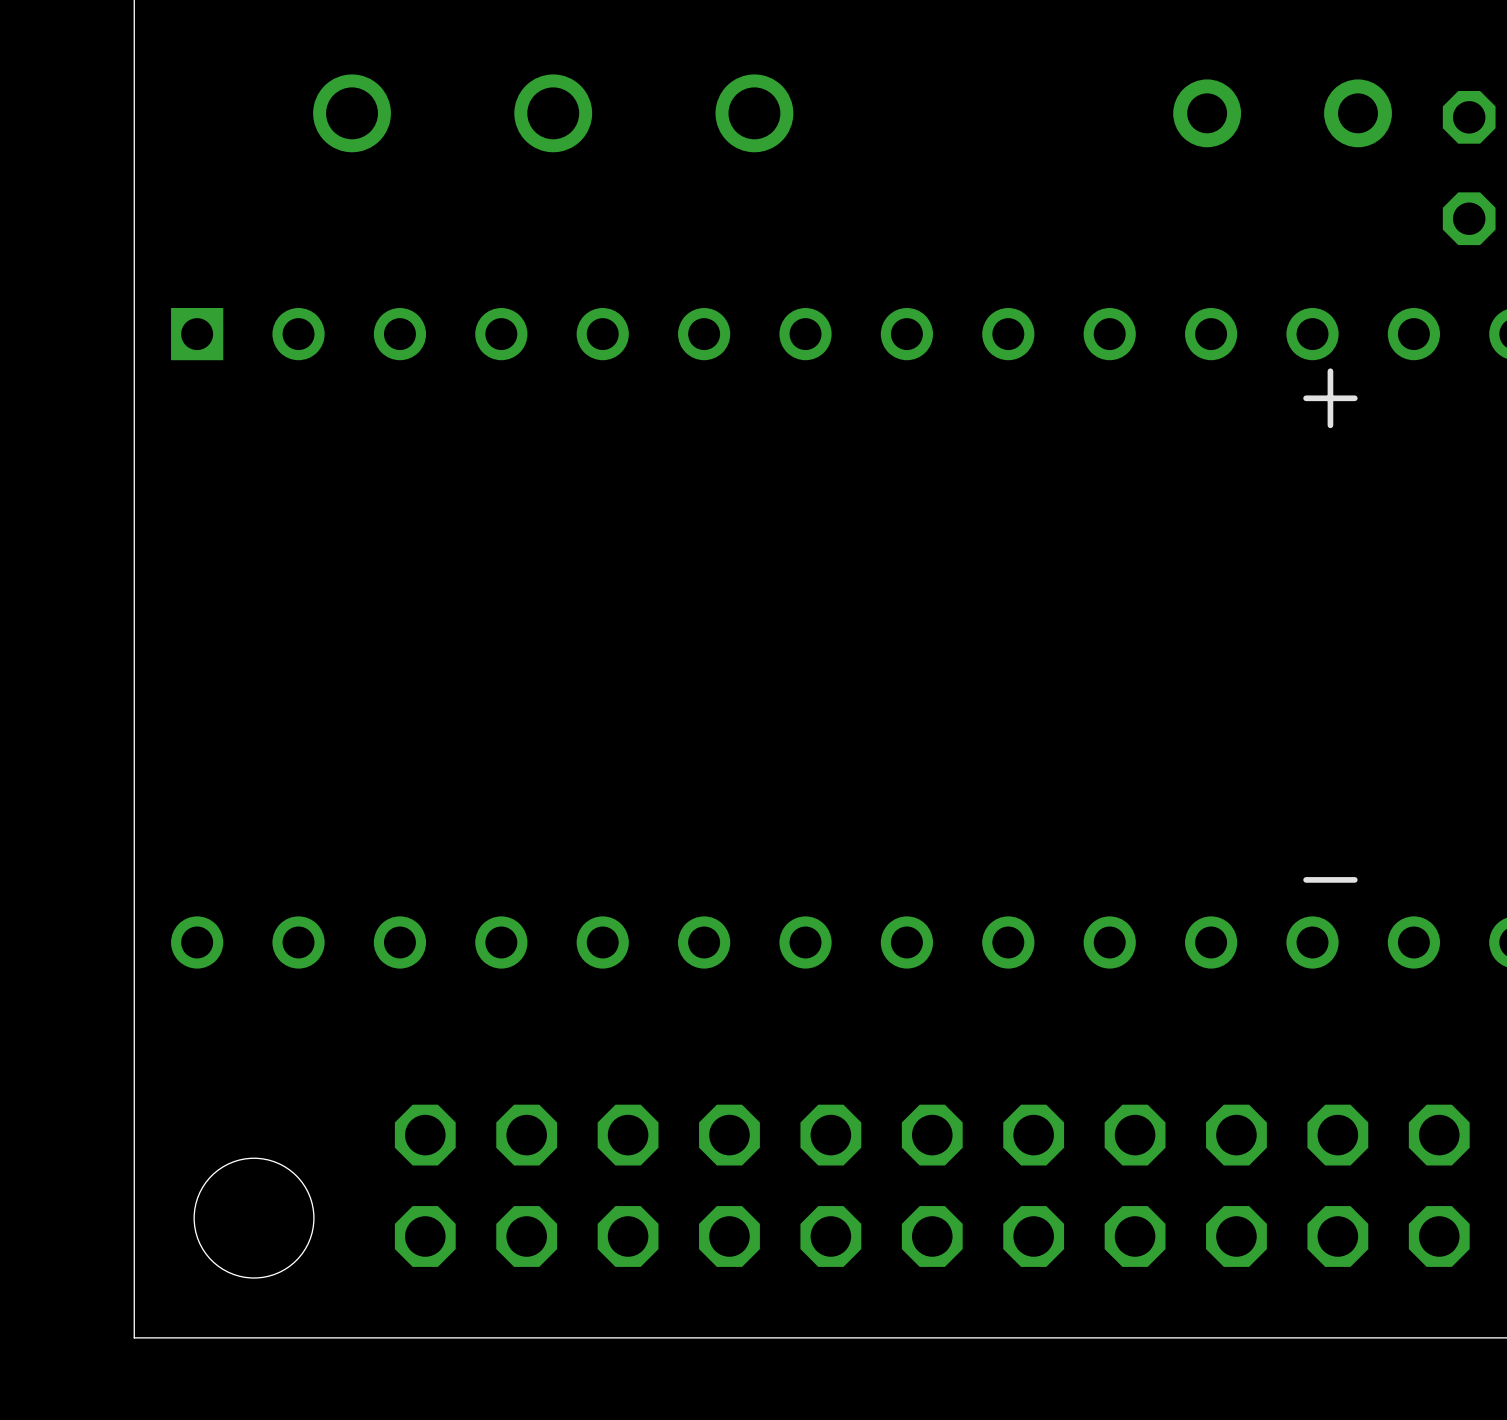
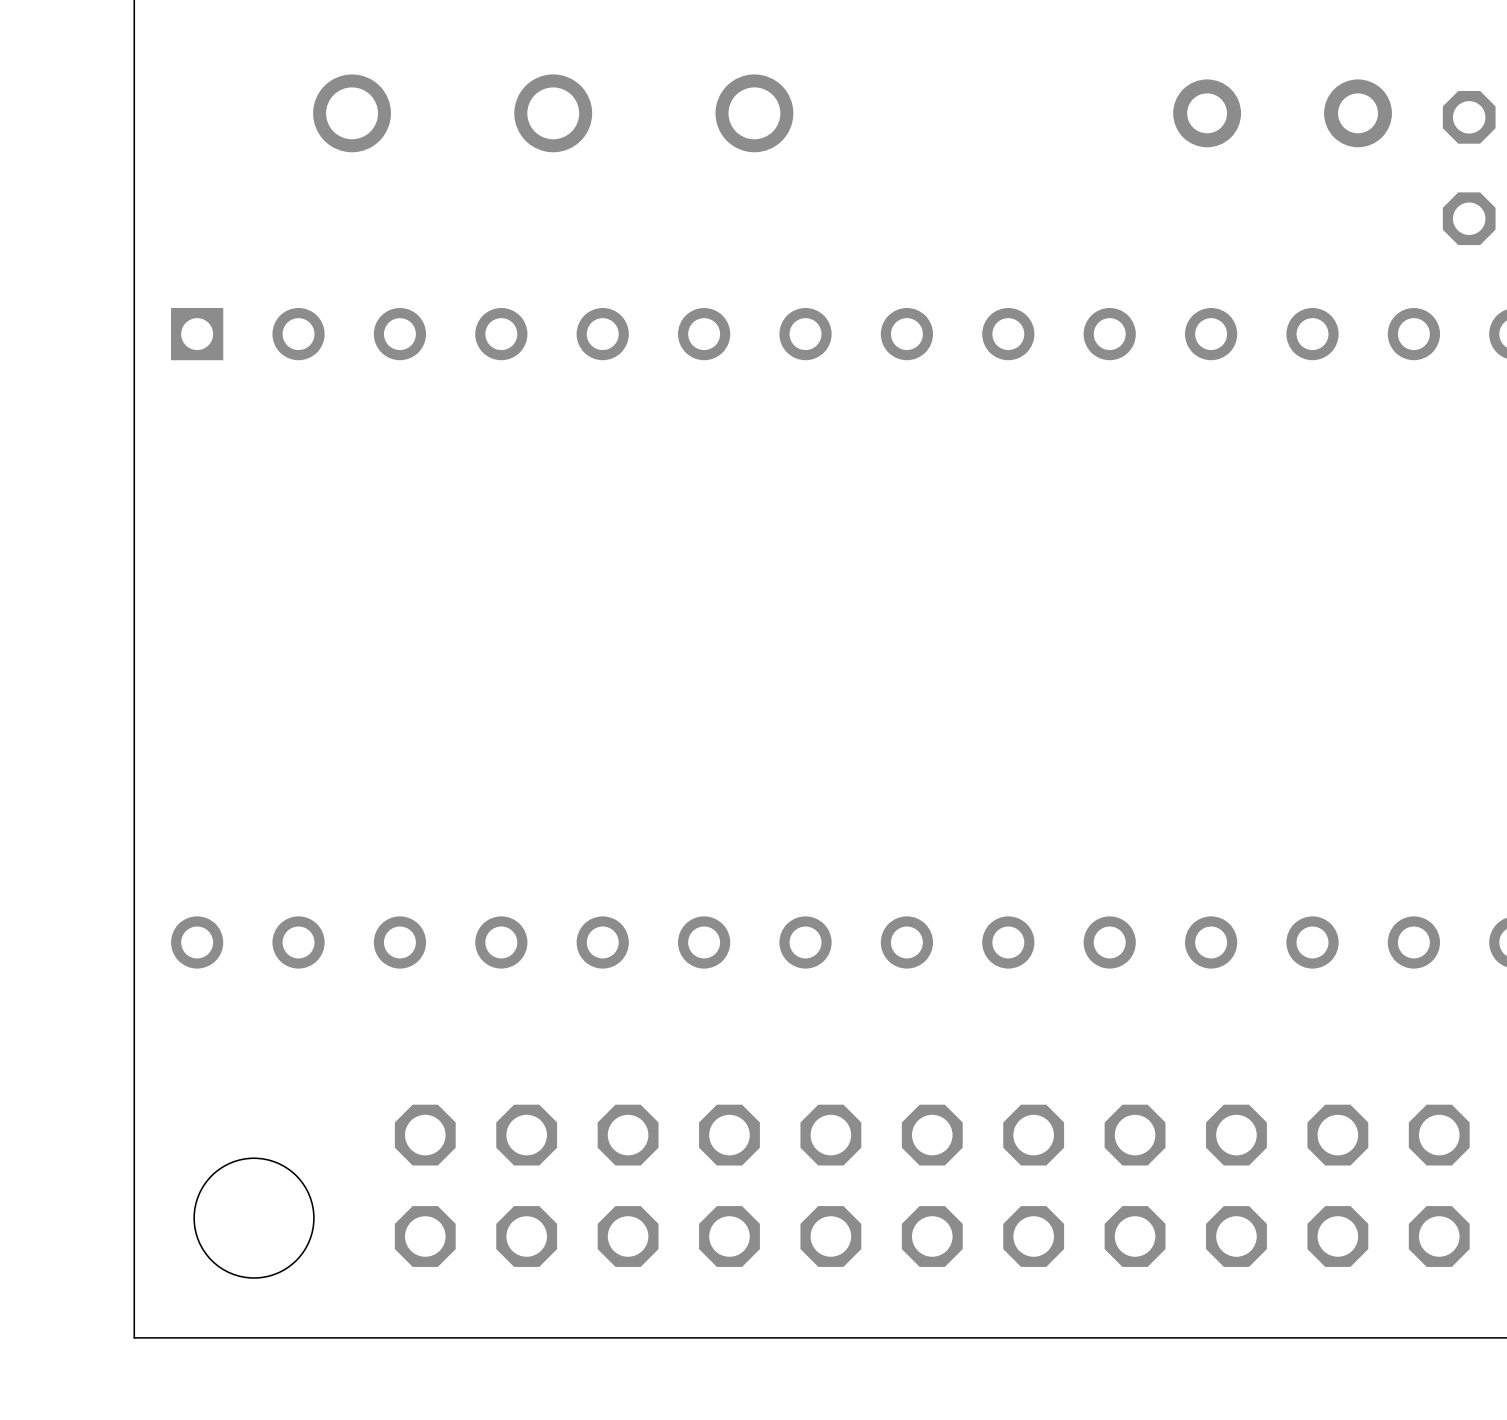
text: + (1330, 398) -> none
text: - (1330, 879) -> none

